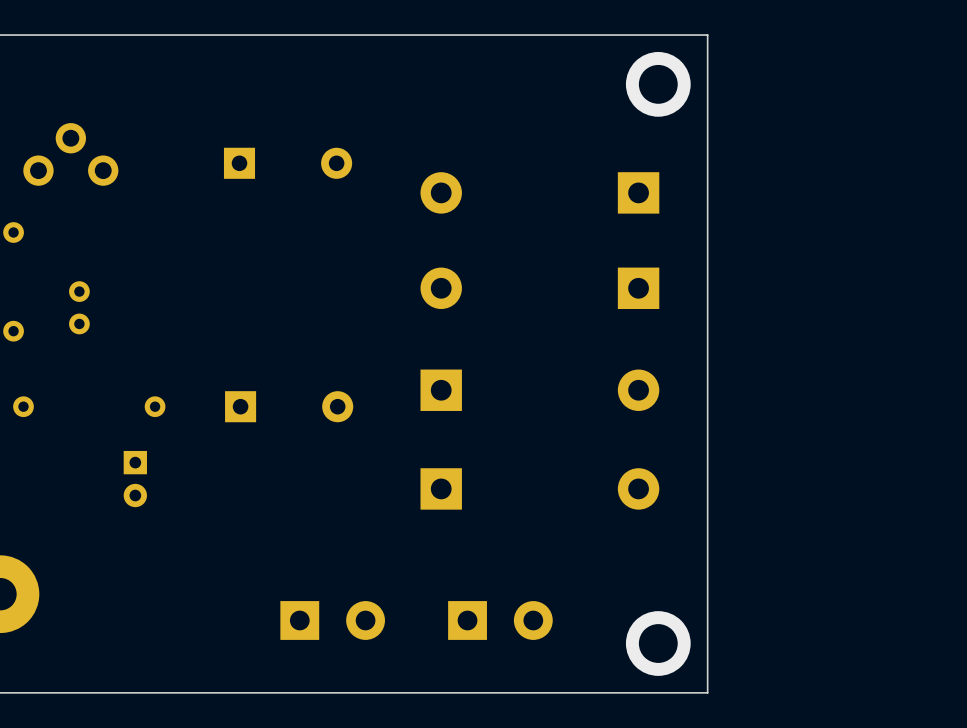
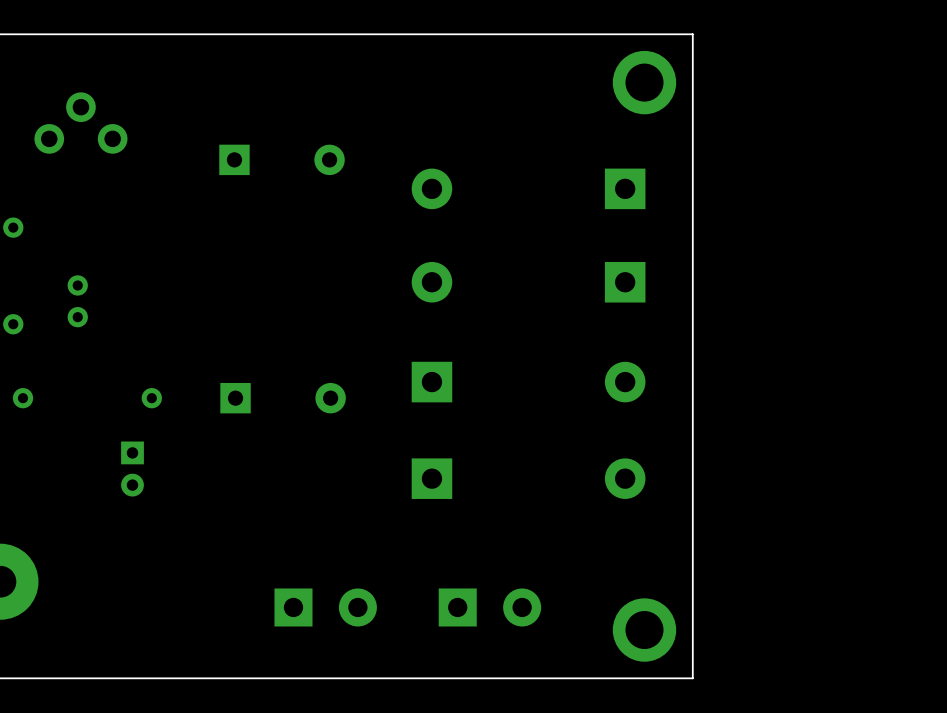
part position: (70, 154) -> (80, 123)

